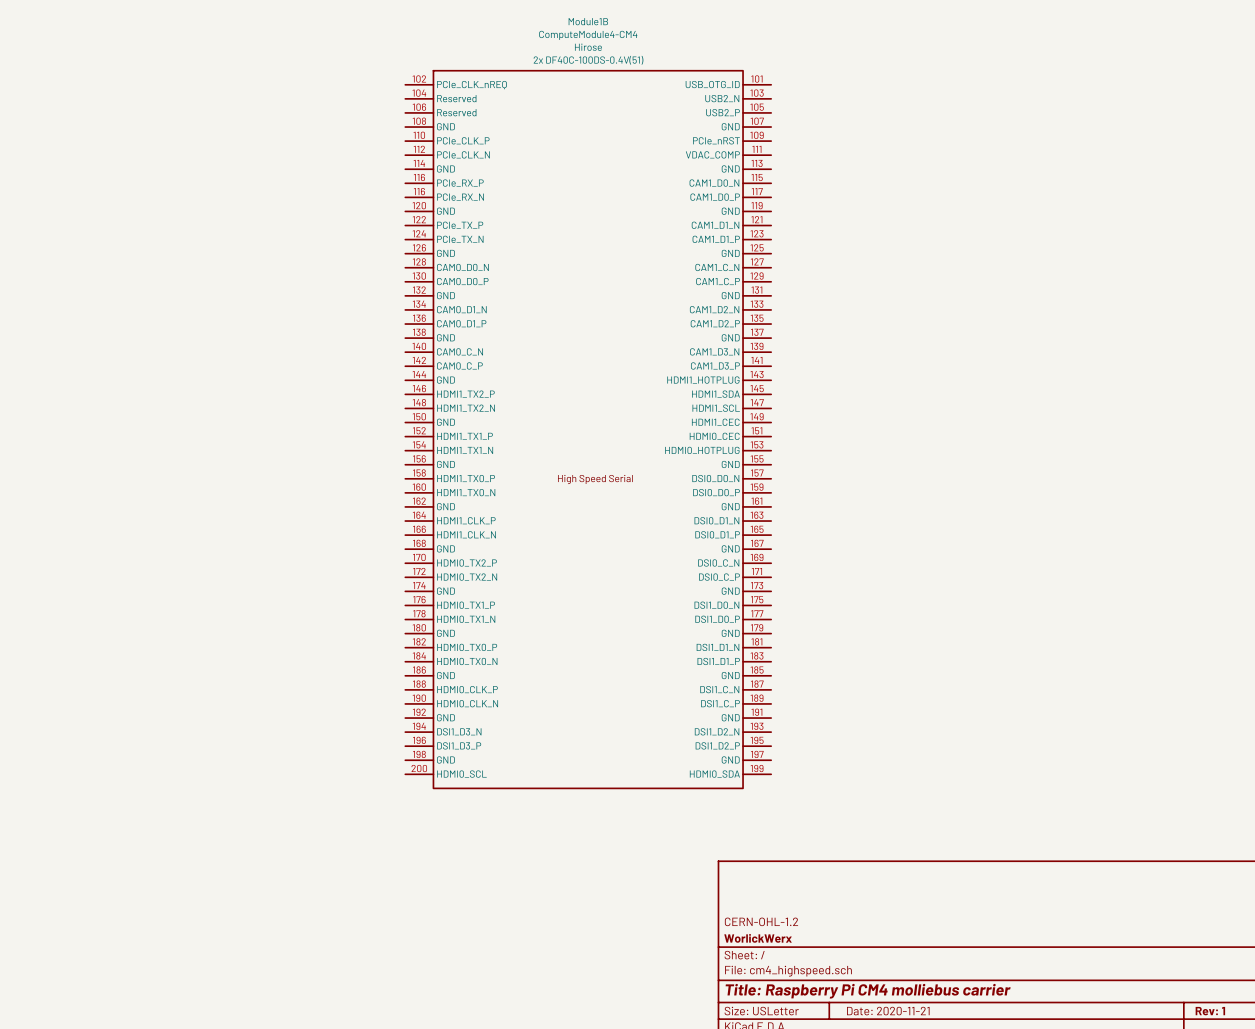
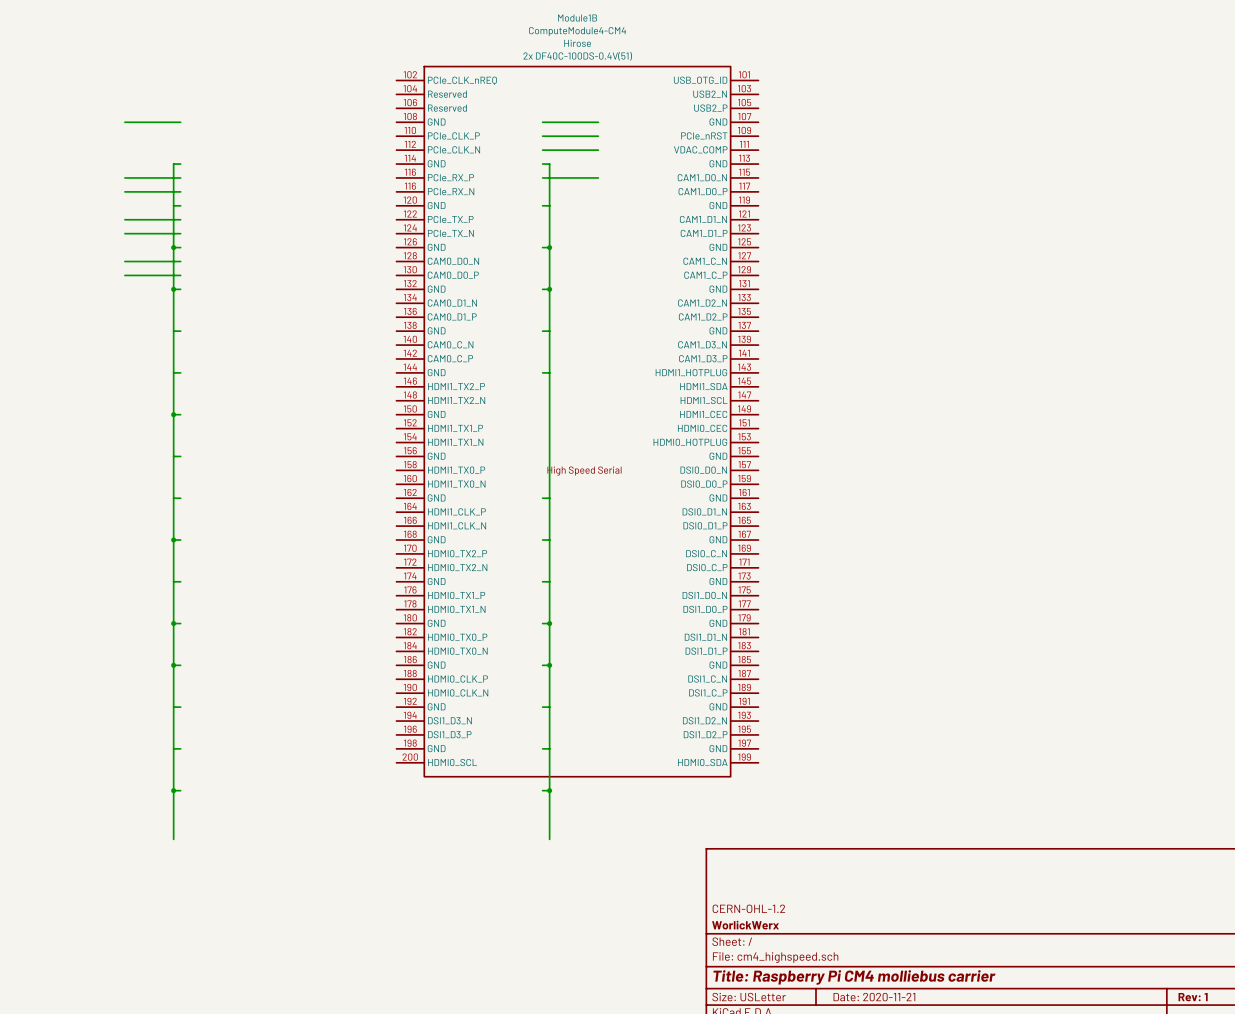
wire: none -> (124, 122) (180, 122)
wire: none -> (542, 122) (598, 122)
wire: none -> (542, 136) (598, 136)
wire: none -> (542, 150) (598, 150)
wire: none -> (180, 164) (173, 164) (173, 839)
wire: none -> (542, 164) (549, 164) (549, 839)
wire: none -> (124, 177) (180, 177)
wire: none -> (542, 177) (598, 177)
wire: none -> (124, 191) (180, 191)
wire: none -> (173, 205) (180, 205)
wire: none -> (542, 205) (549, 205)
wire: none -> (124, 219) (180, 219)
wire: none -> (124, 233) (180, 233)
wire: none -> (173, 247) (180, 247)
junction: none -> (173, 247)
wire: none -> (542, 247) (549, 247)
junction: none -> (549, 247)
wire: none -> (124, 261) (180, 261)
wire: none -> (124, 275) (180, 275)
wire: none -> (173, 289) (180, 289)
junction: none -> (173, 289)
wire: none -> (542, 289) (549, 289)
junction: none -> (549, 289)
wire: none -> (173, 331) (180, 331)
wire: none -> (542, 331) (549, 331)
wire: none -> (173, 372) (180, 372)
wire: none -> (542, 372) (549, 372)
wire: none -> (173, 414) (180, 414)
junction: none -> (173, 414)
wire: none -> (173, 456) (180, 456)
wire: none -> (173, 498) (180, 498)
wire: none -> (542, 498) (549, 498)
wire: none -> (173, 540) (180, 540)
junction: none -> (173, 540)
wire: none -> (542, 540) (549, 540)
wire: none -> (173, 581) (180, 581)
wire: none -> (542, 581) (549, 581)
wire: none -> (173, 623) (180, 623)
junction: none -> (173, 623)
wire: none -> (542, 623) (549, 623)
junction: none -> (549, 623)
wire: none -> (173, 665) (180, 665)
junction: none -> (173, 665)
wire: none -> (542, 665) (549, 665)
junction: none -> (549, 665)
wire: none -> (173, 707) (180, 707)
wire: none -> (542, 707) (549, 707)
wire: none -> (173, 748) (180, 748)
wire: none -> (542, 748) (549, 748)
wire: none -> (173, 790) (180, 790)
junction: none -> (173, 790)
wire: none -> (542, 790) (549, 790)
junction: none -> (549, 790)

